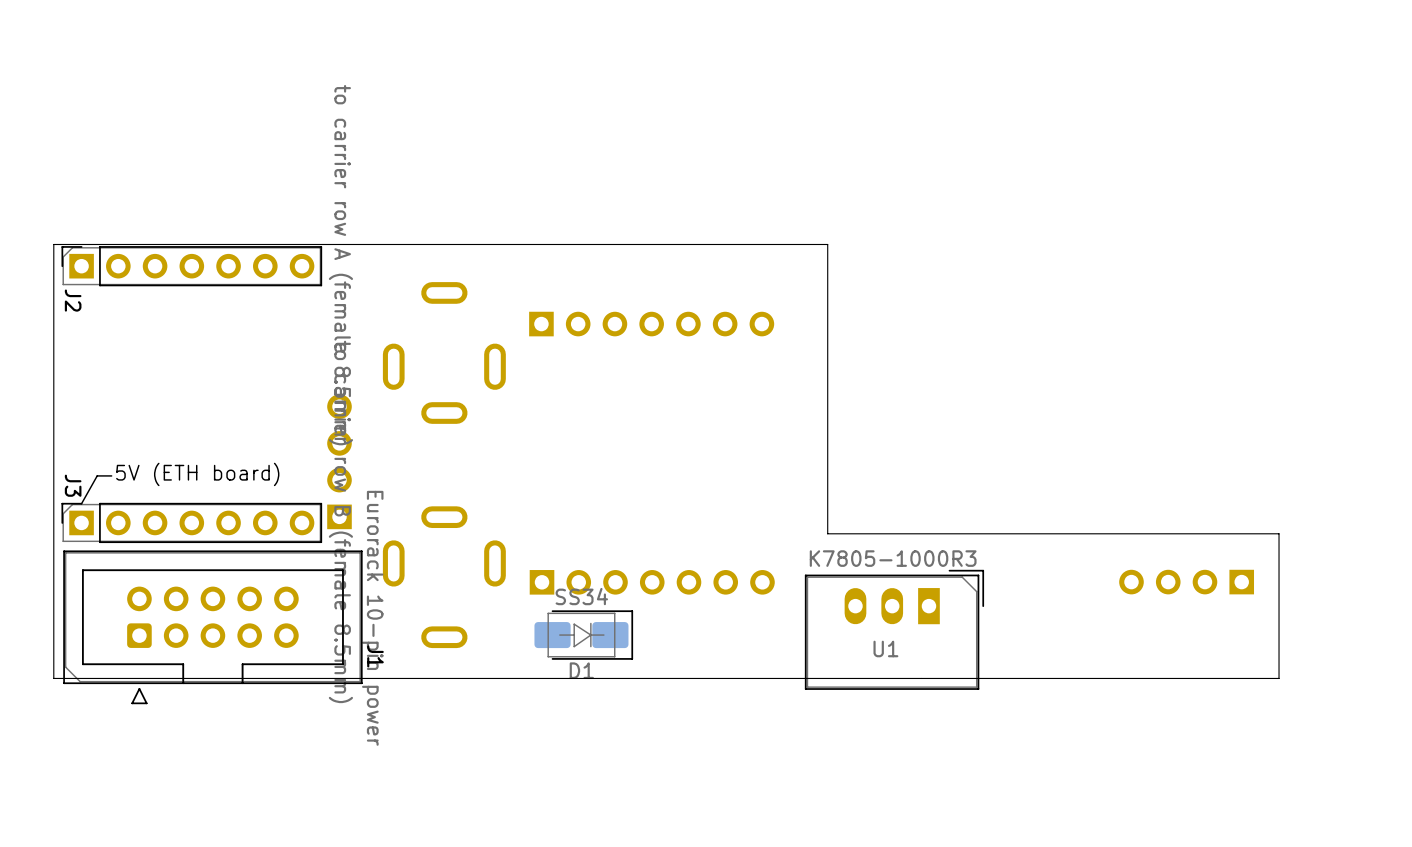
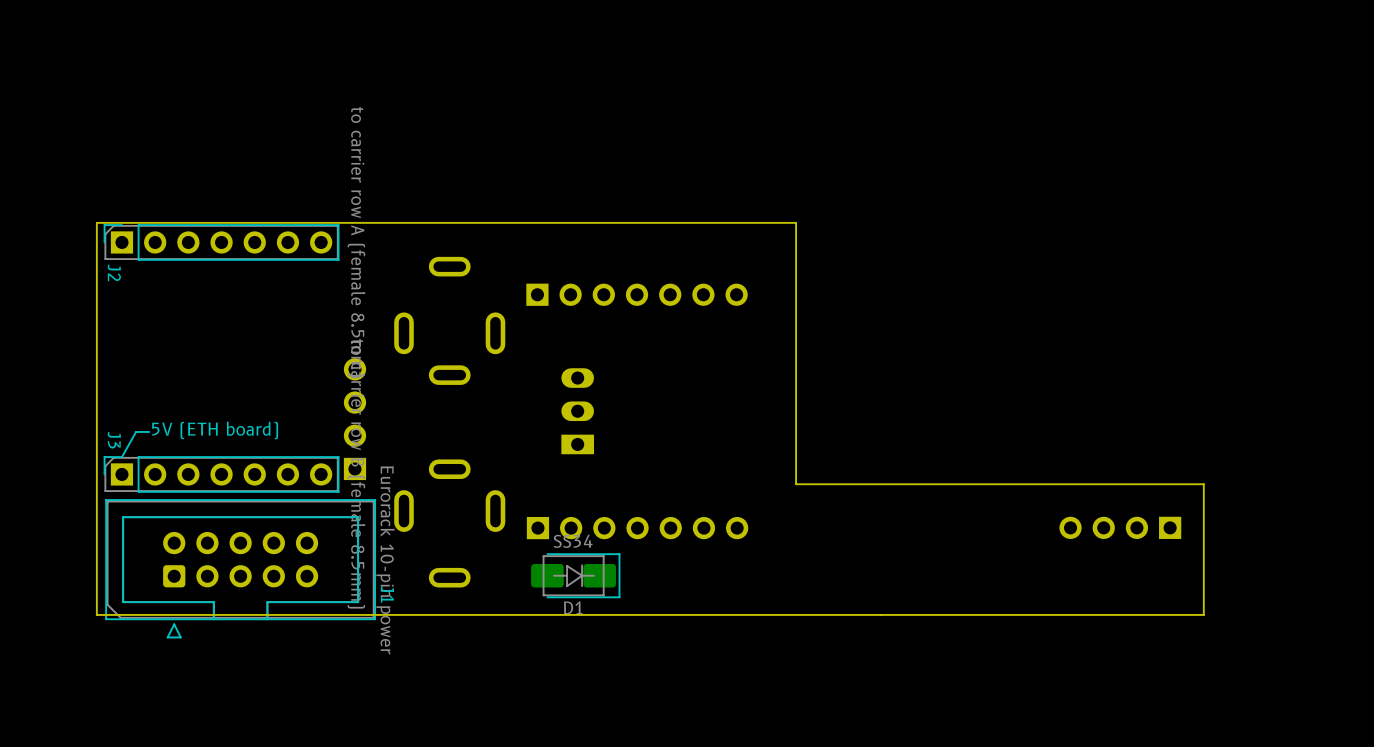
U1 side: bottom (894, 629) -> top (577, 411)

